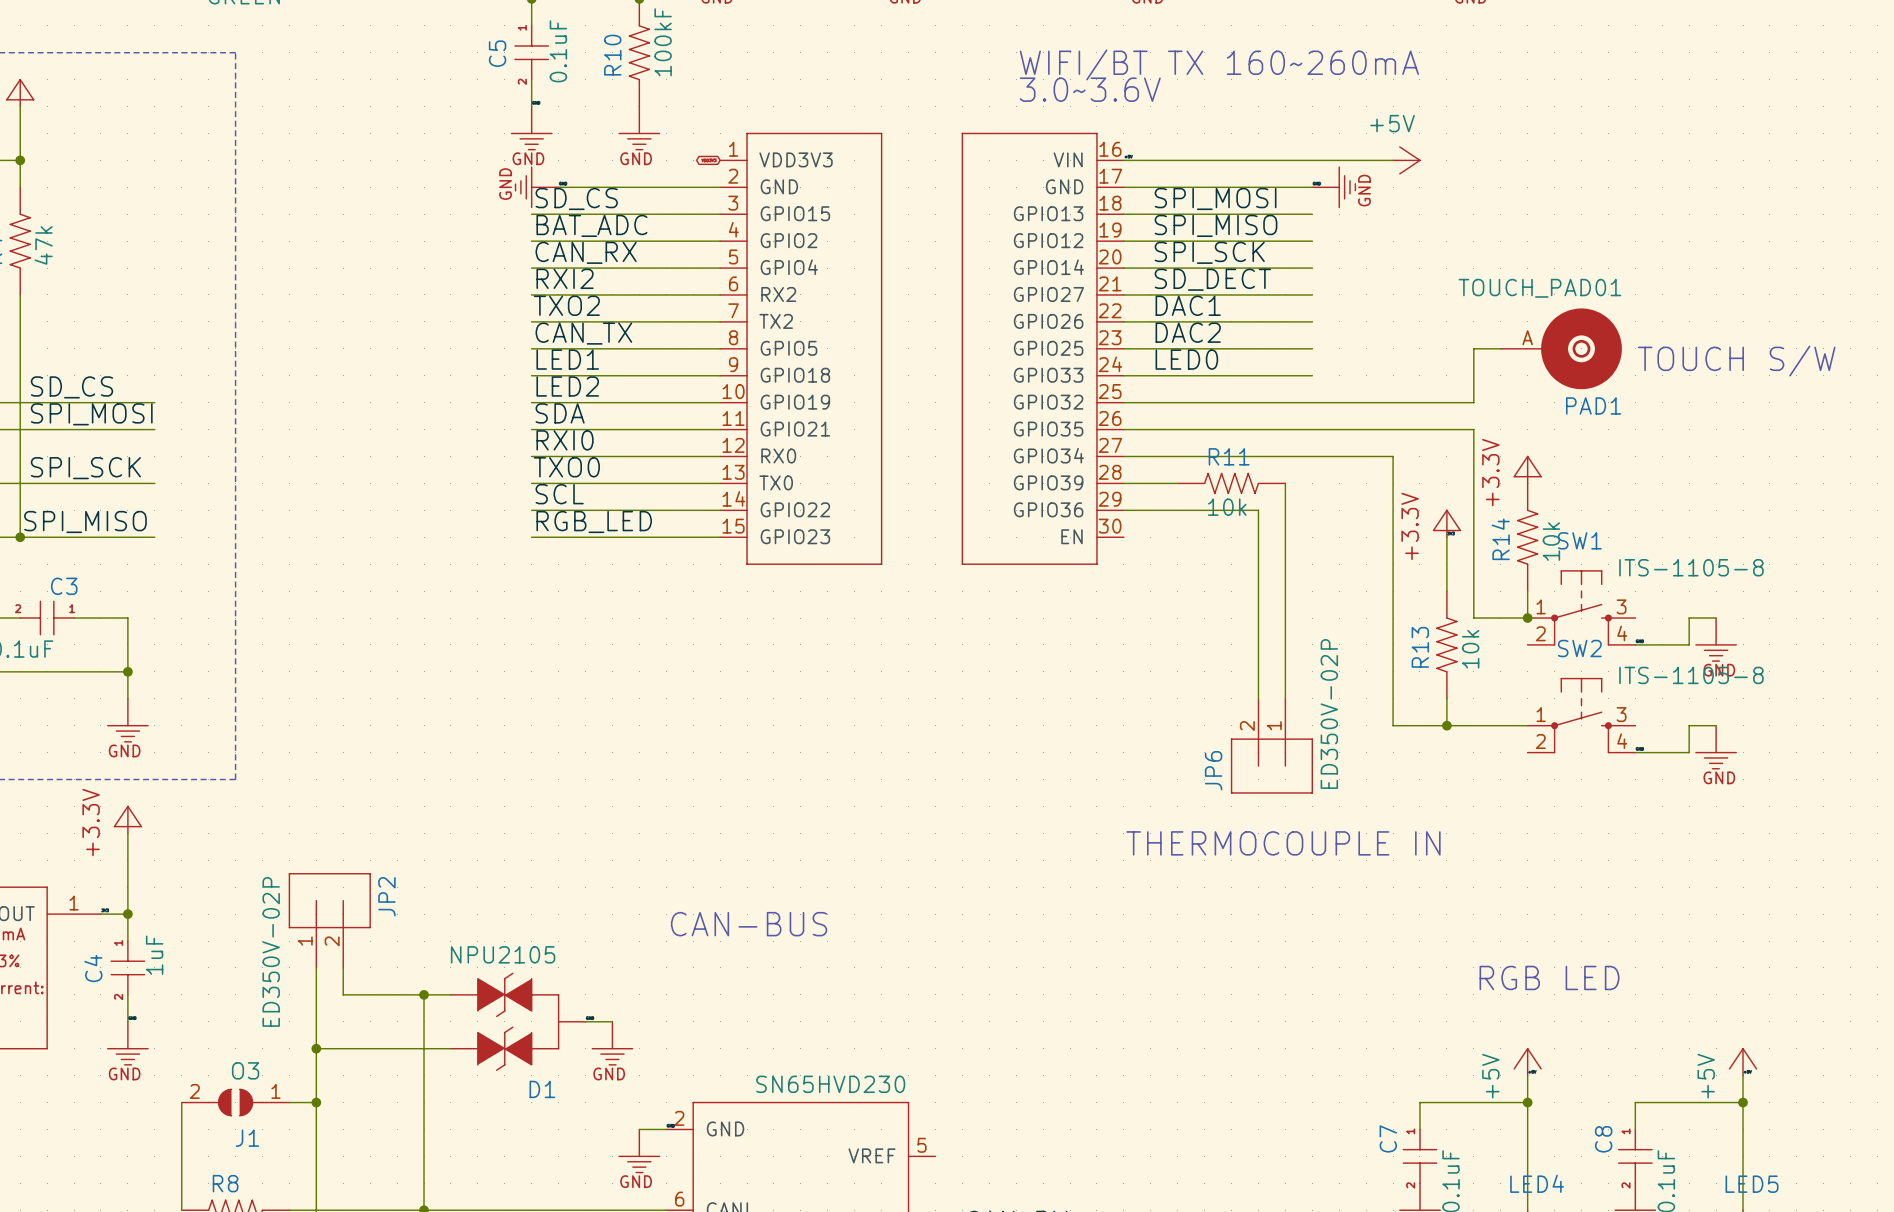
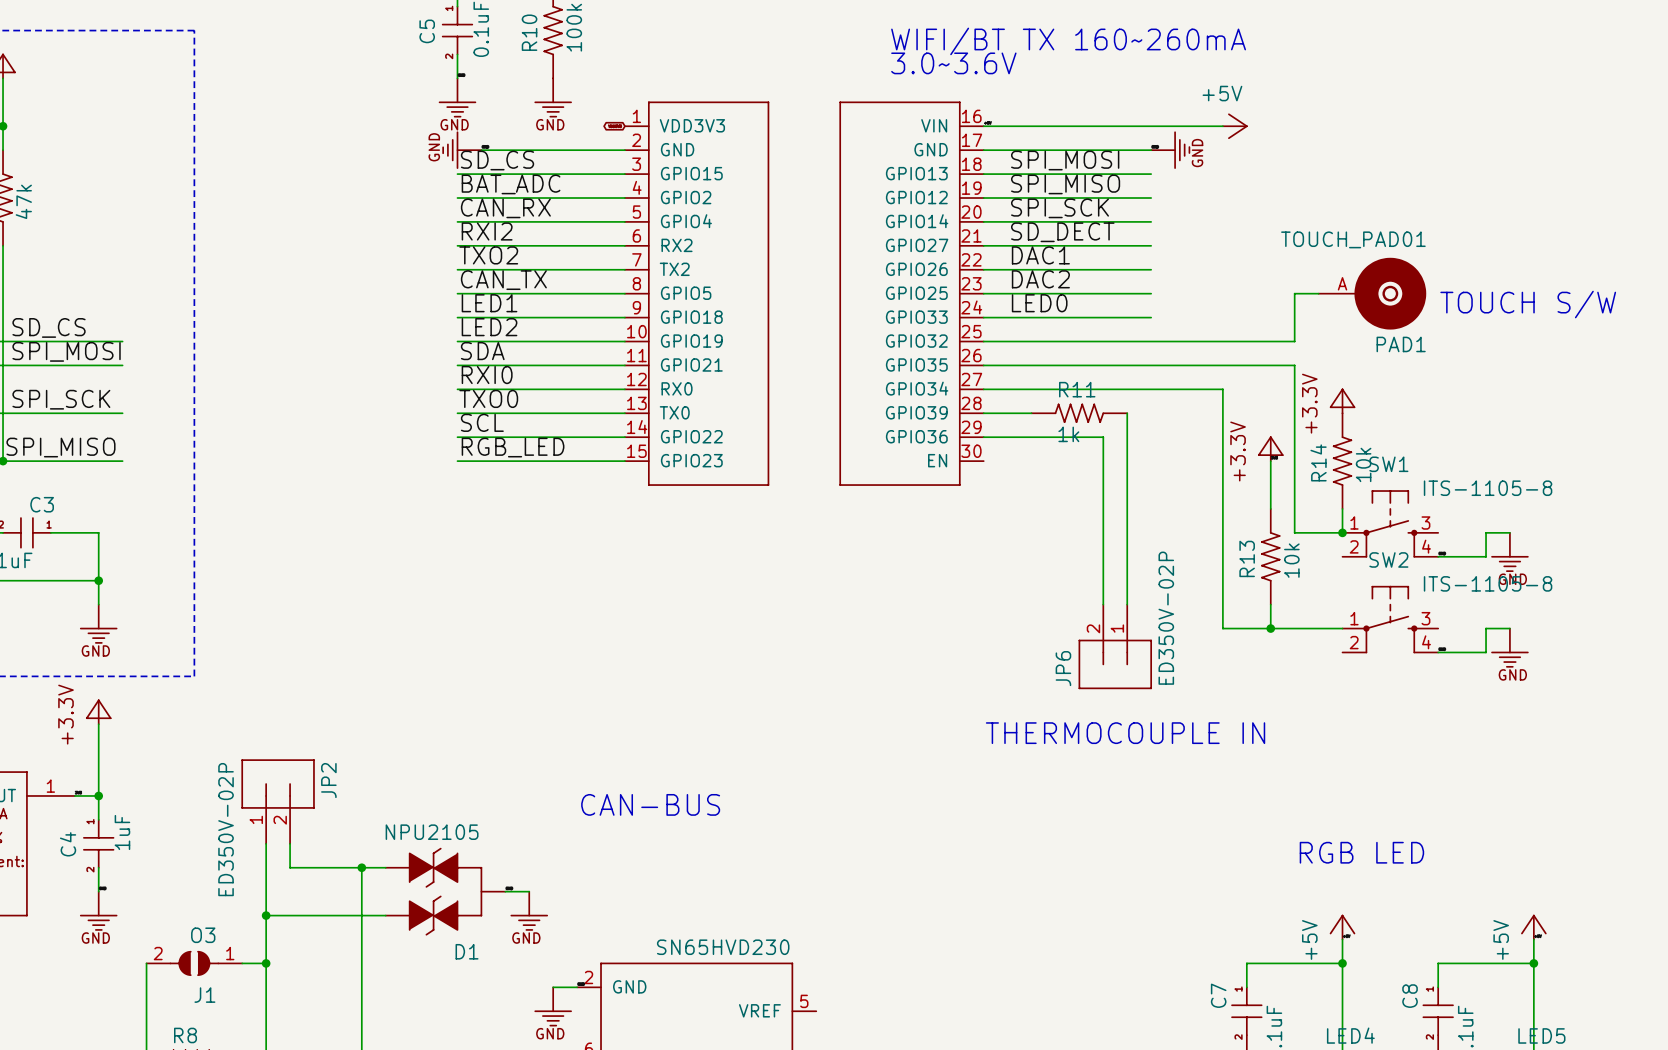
R11 value: 10k (1227, 507) -> 1k (1068, 434)

